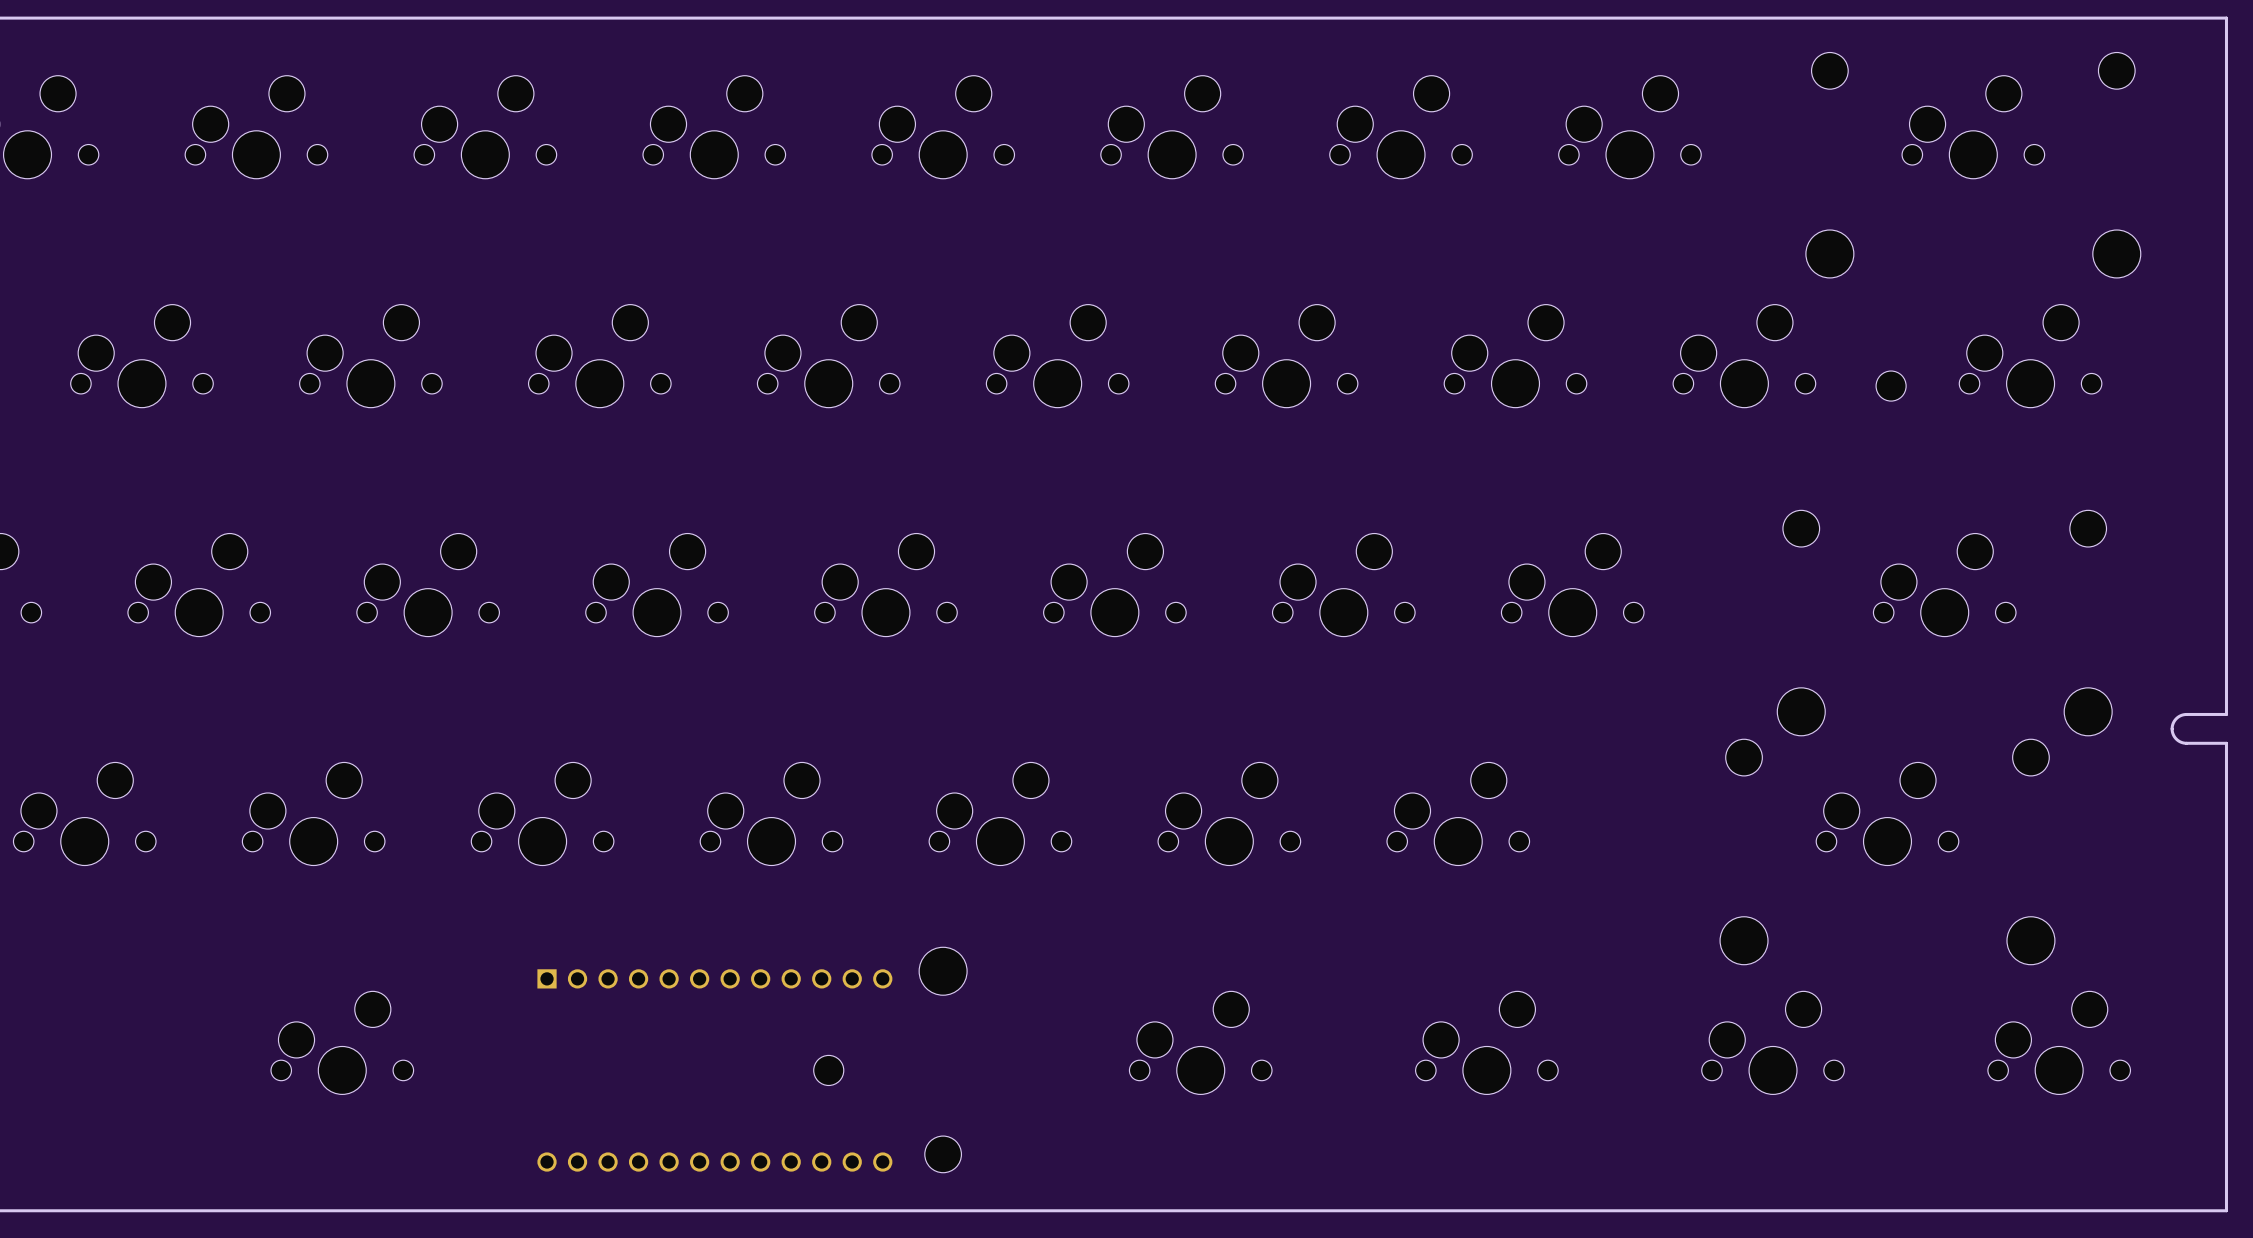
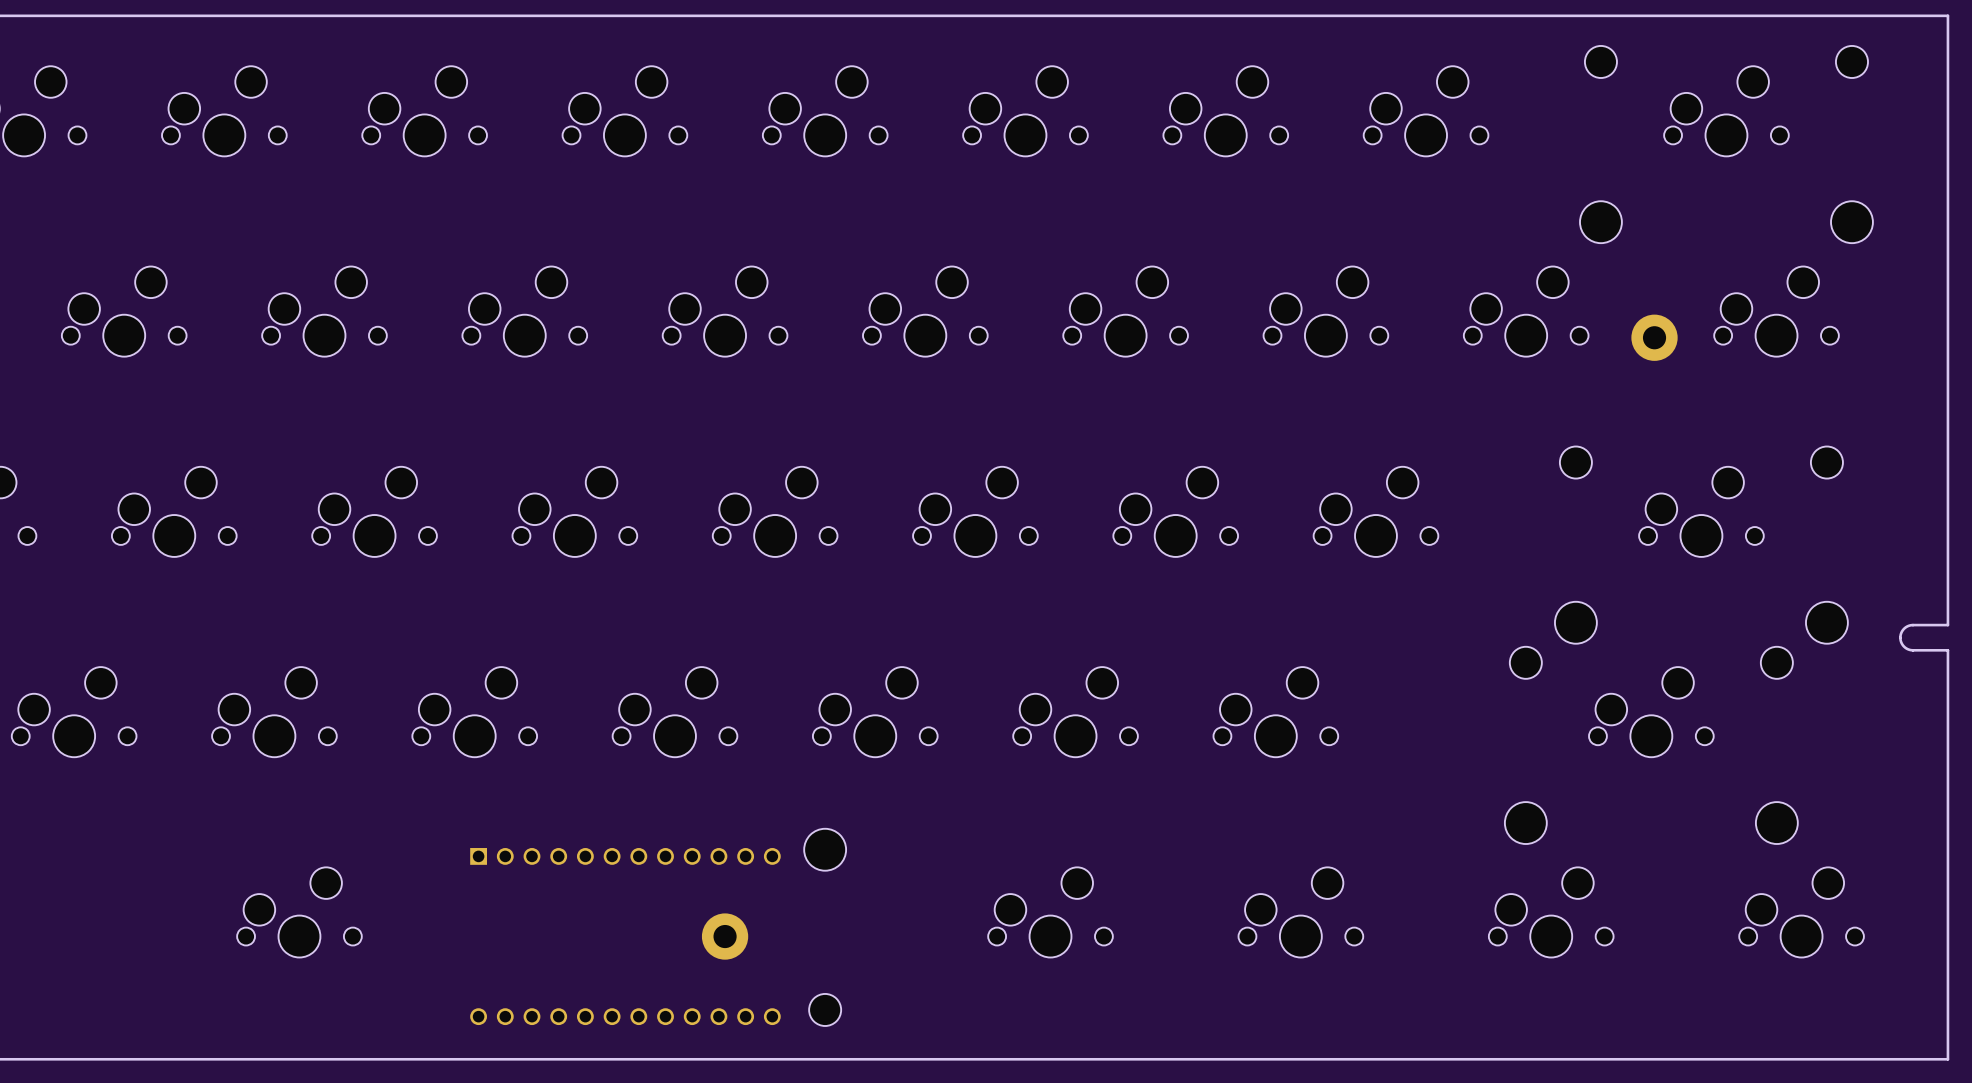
part footprint: [1876, 371, 1907, 402] -> [1631, 314, 1678, 361]
part footprint: [813, 1055, 844, 1086] -> [701, 913, 749, 960]

